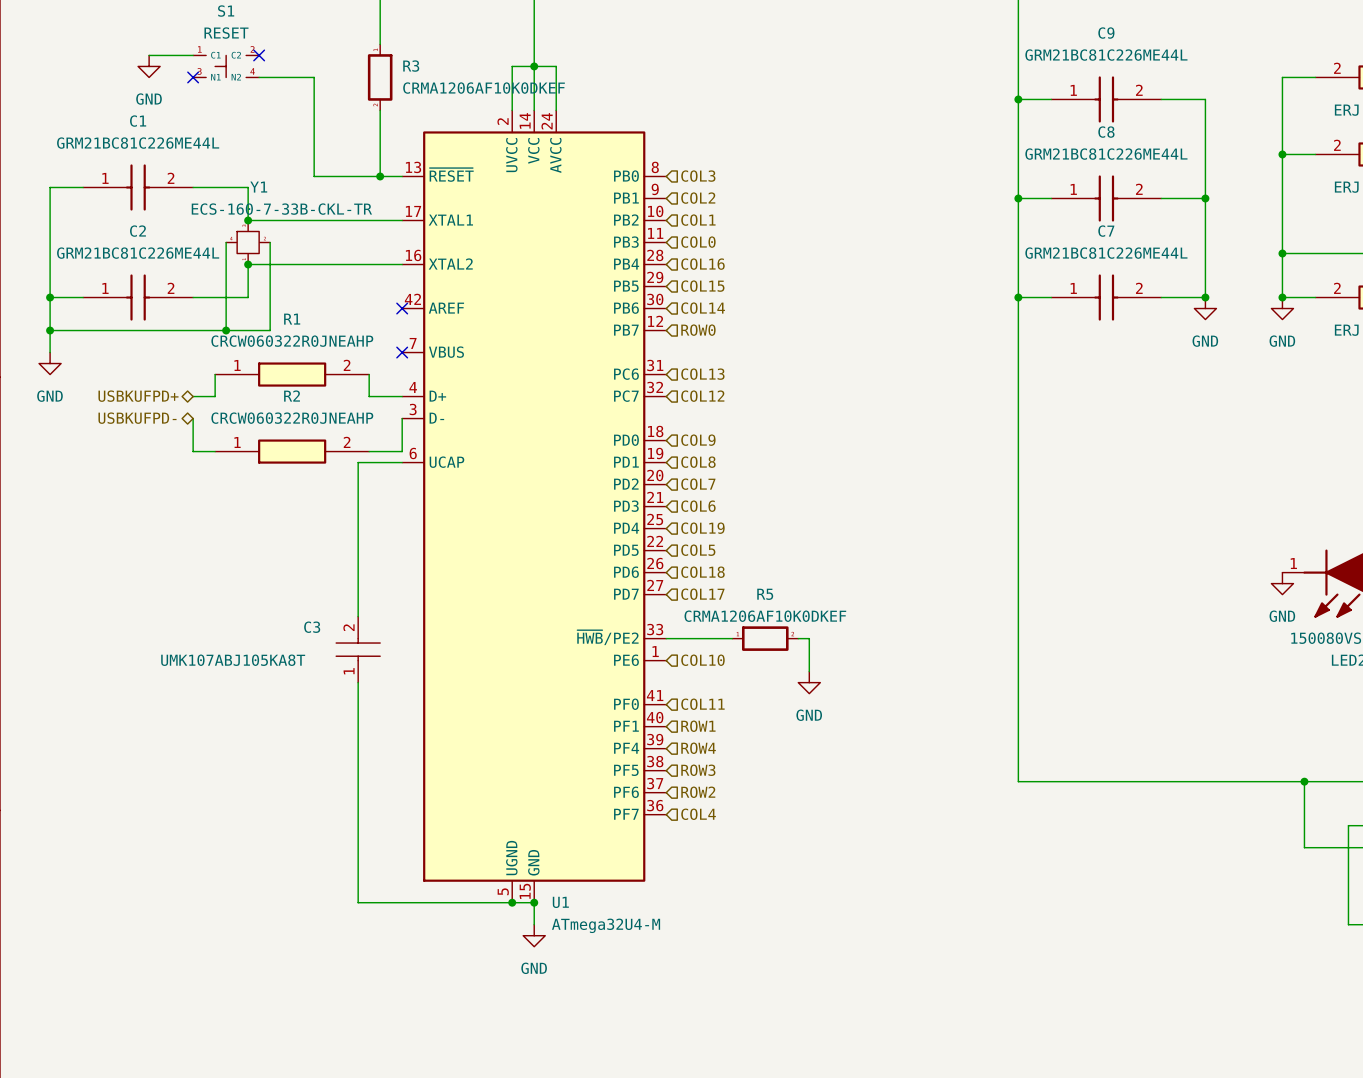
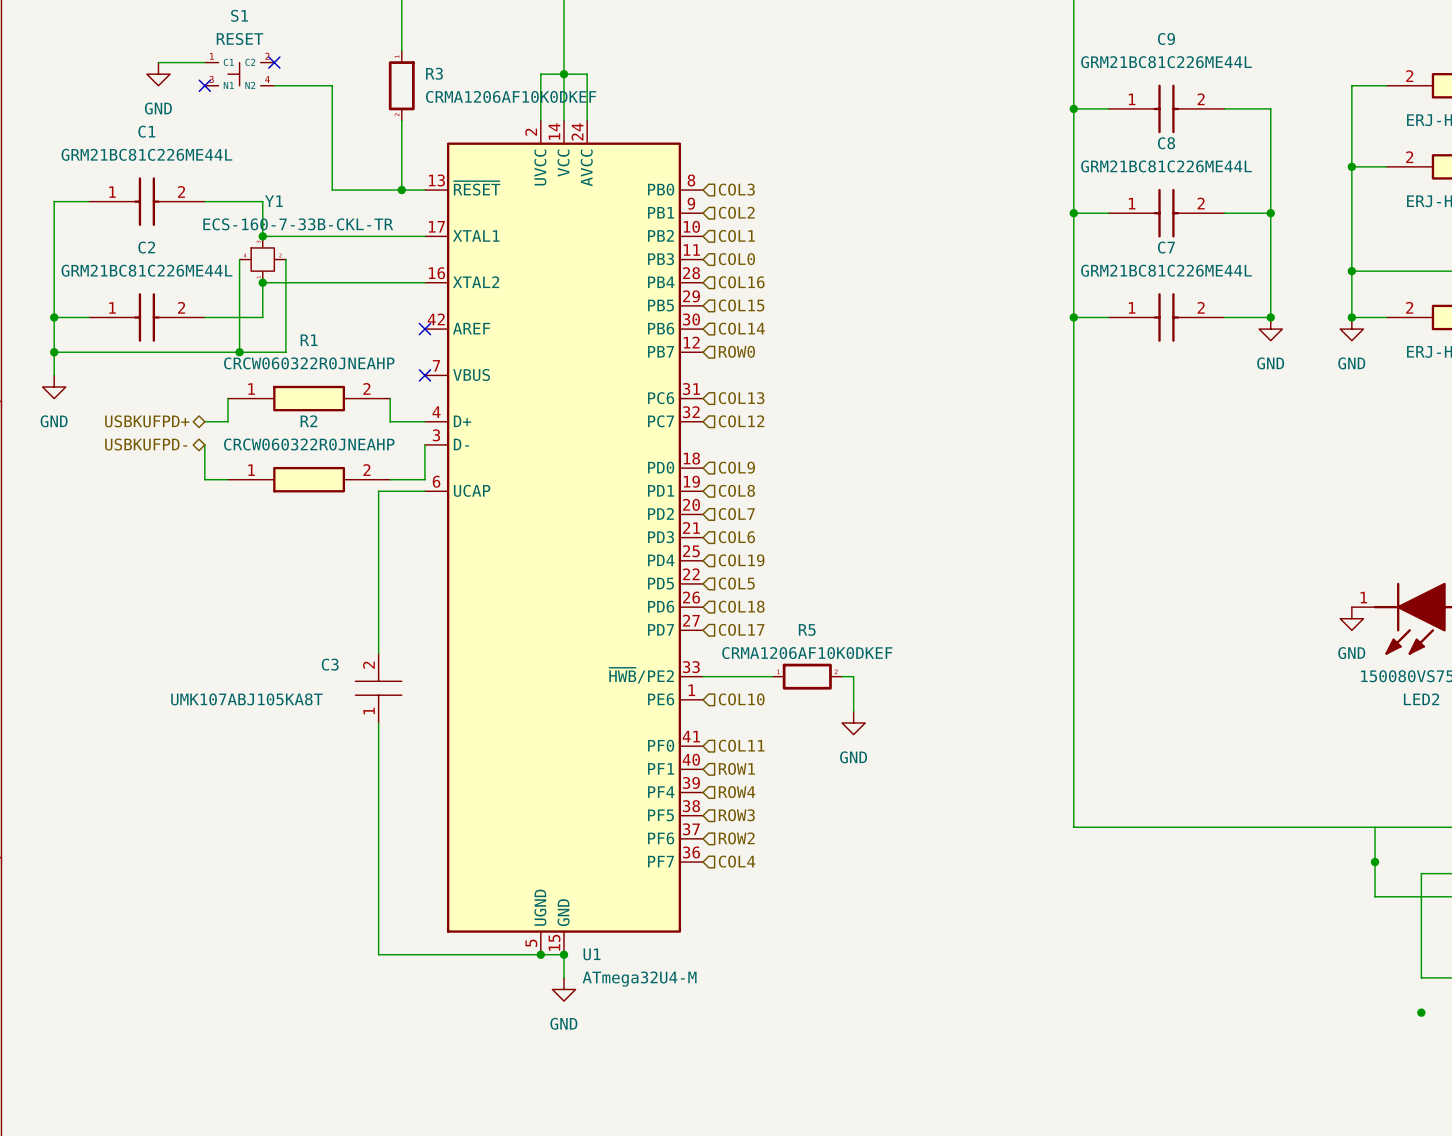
junction position: (1304, 781) -> (1375, 862)
junction: none -> (1421, 1012)

